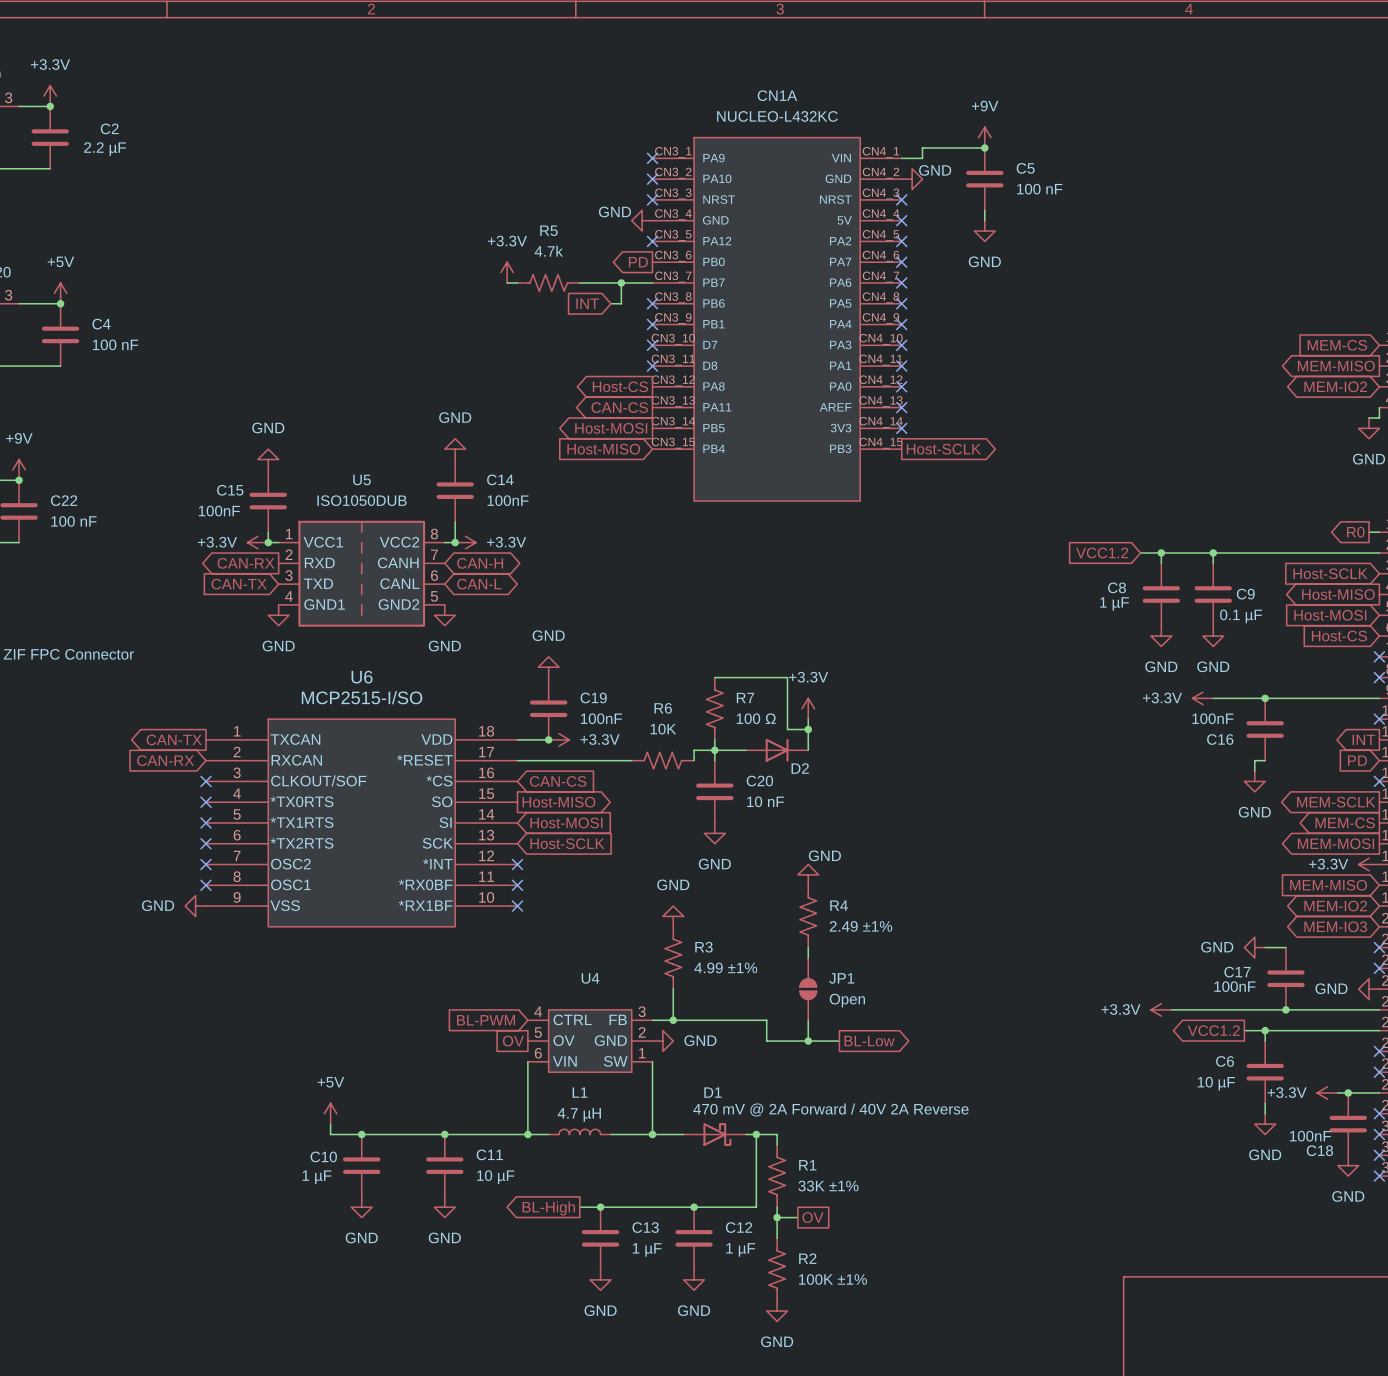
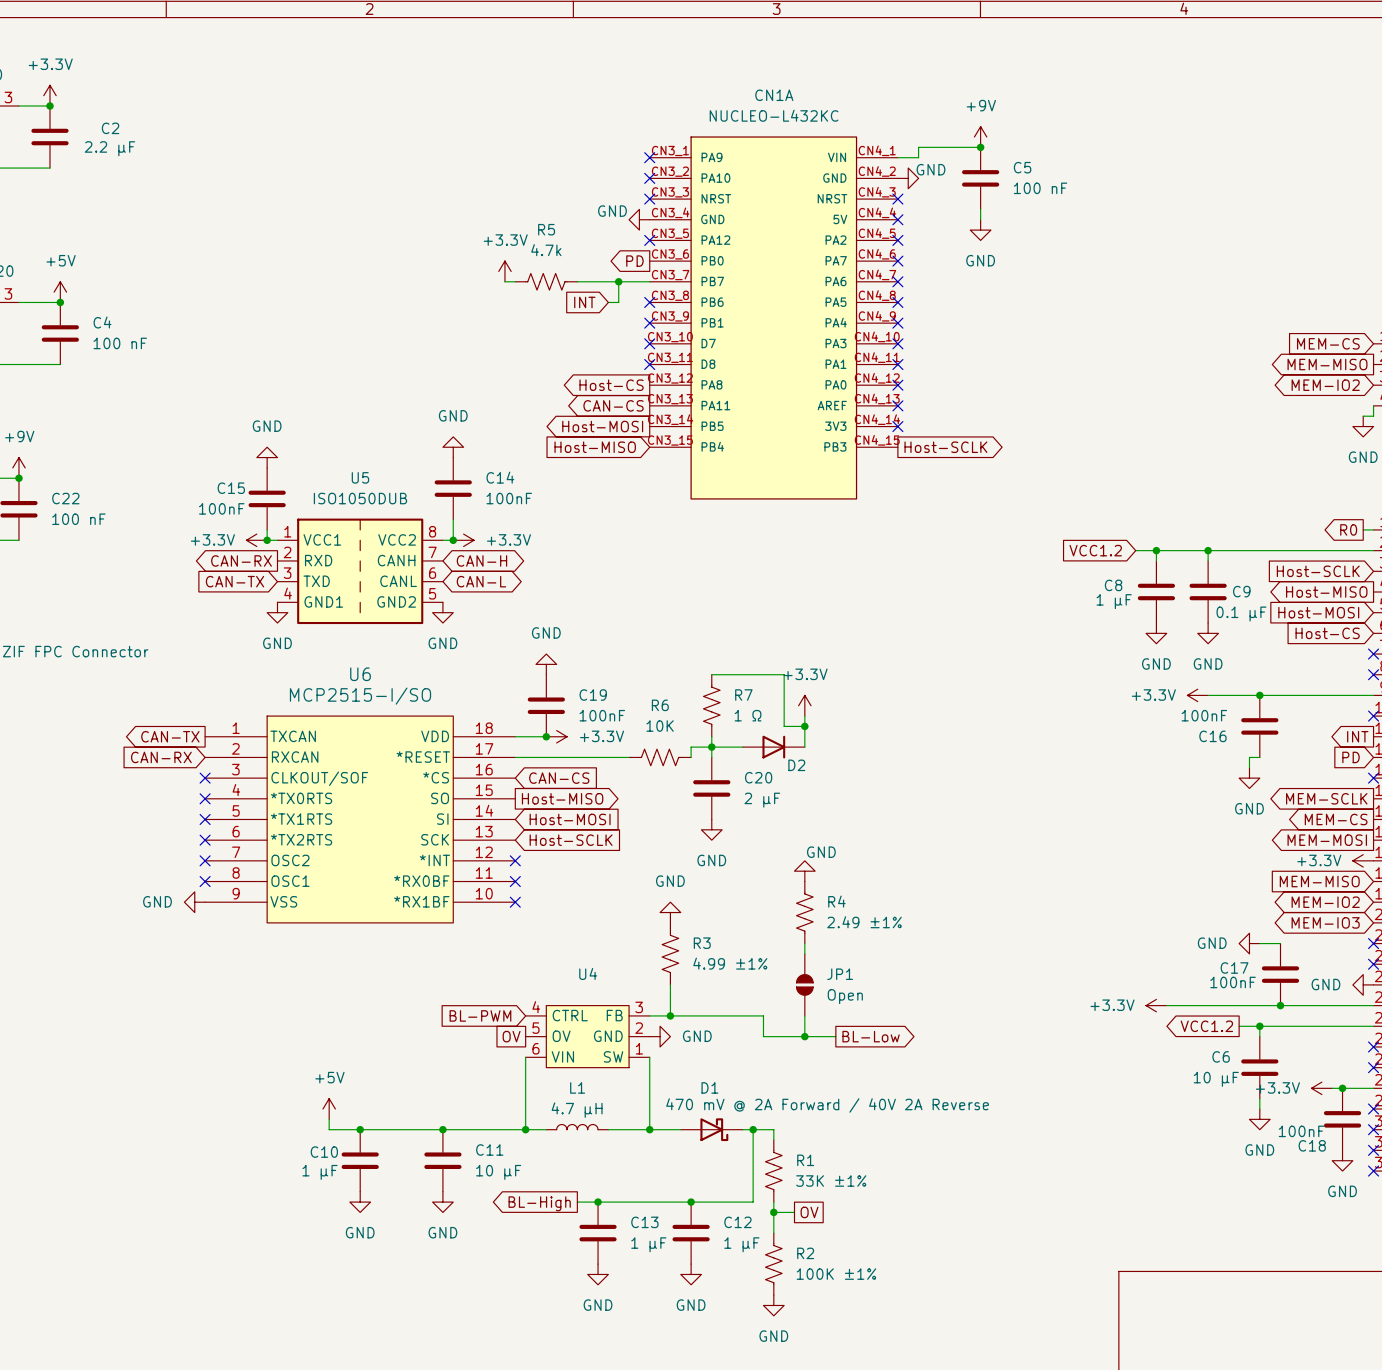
R7 value: 100 Ω (756, 718) -> 1 Ω (748, 715)
C20 value: 10 nF (765, 801) -> 2 µF (762, 800)

